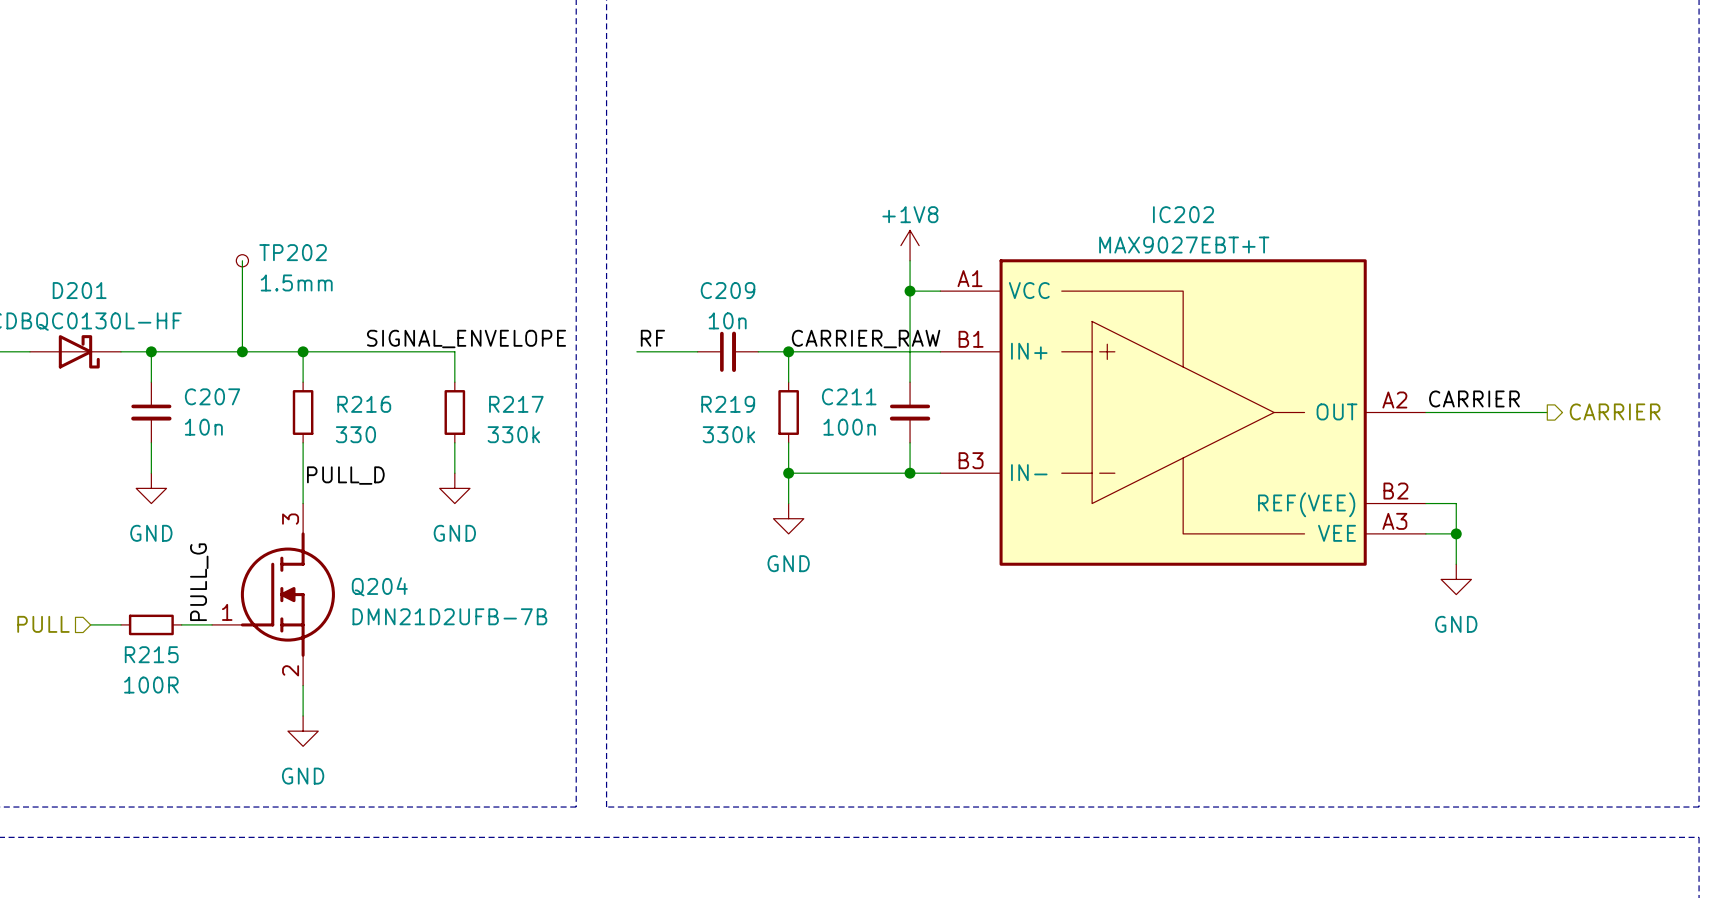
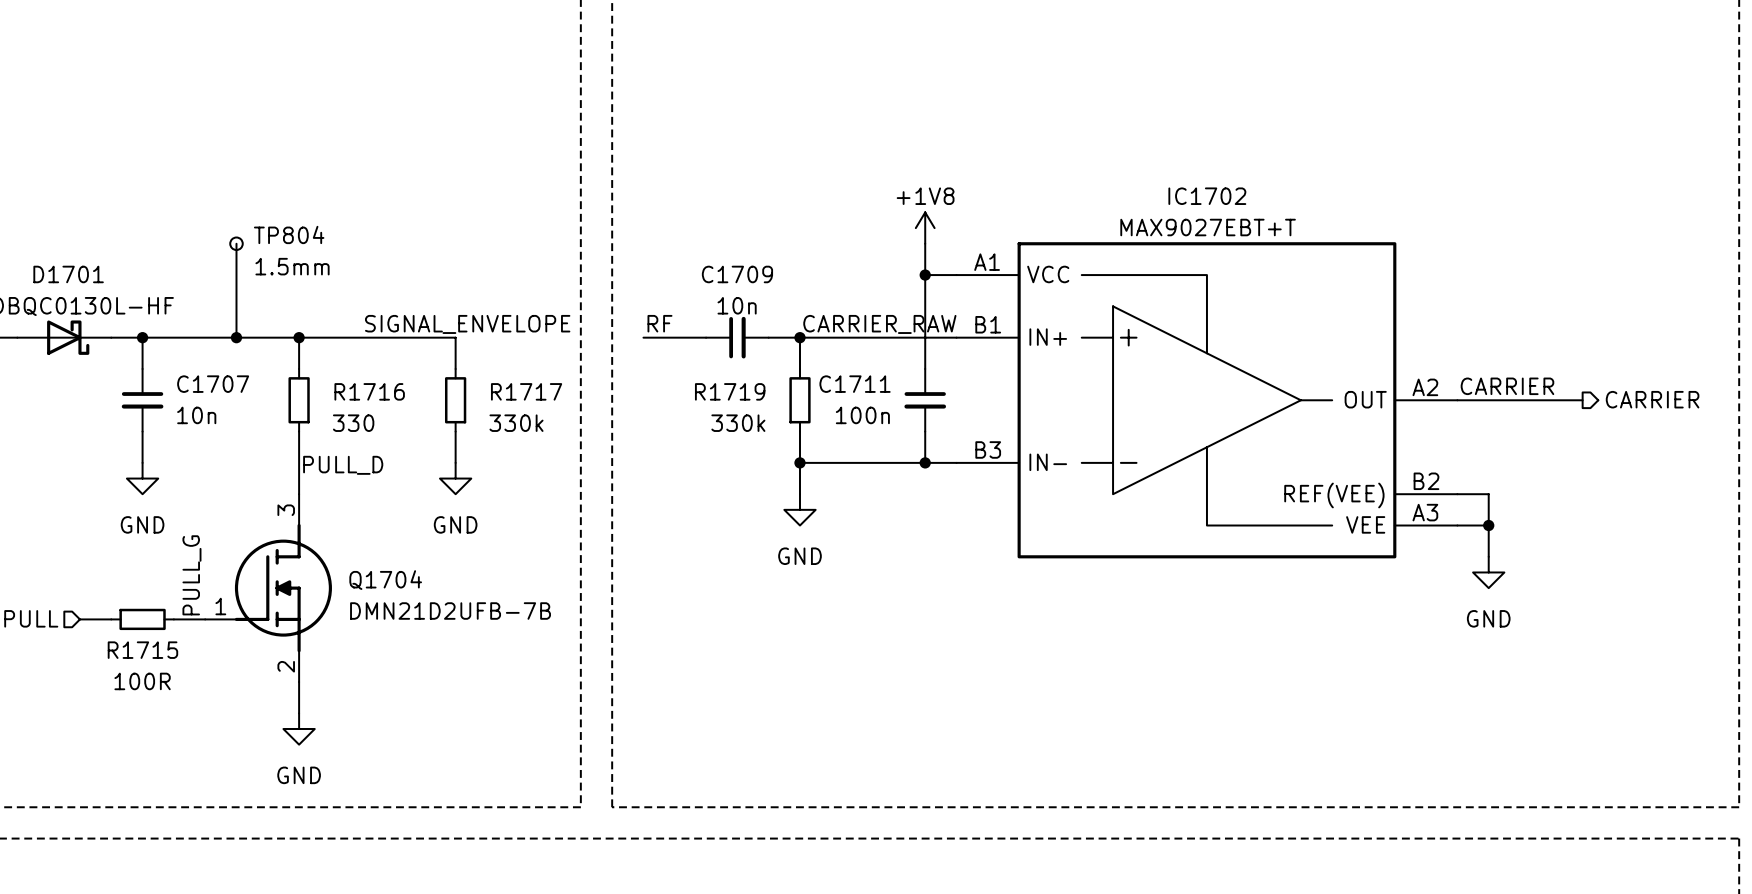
IC202 name: IC202 (1183, 214) -> IC1702 (1207, 196)
TP202 name: TP202 (293, 252) -> TP804 (289, 234)
D201 name: D201 (79, 290) -> D1701 (68, 274)
C209 name: C209 (728, 290) -> C1709 (737, 274)
C207 name: C207 (212, 396) -> C1707 (213, 384)
C211 name: C211 (849, 396) -> C1711 (855, 384)
R216 name: R216 (364, 404) -> R1716 (369, 391)
R217 name: R217 (516, 404) -> R1717 (526, 391)
R219 name: R219 (728, 404) -> R1719 (730, 391)
Q204 name: Q204 (379, 586) -> Q1704 (385, 580)
R215 name: R215 (151, 654) -> R1715 (142, 650)

